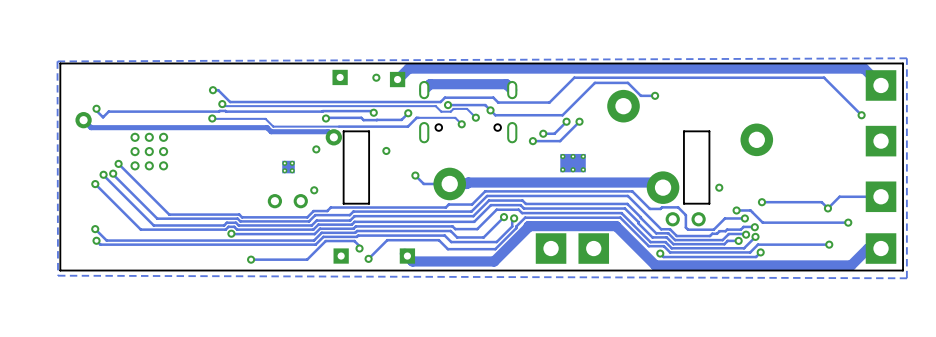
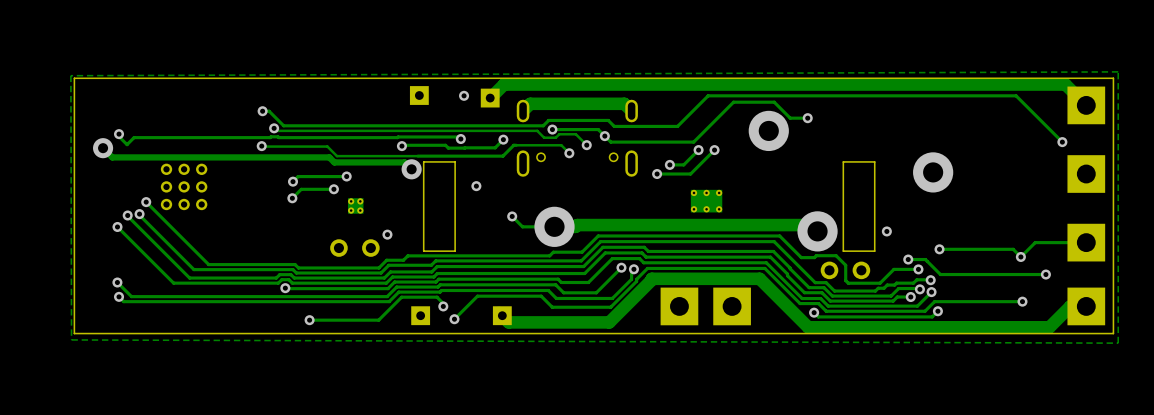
track: none -> (346, 176) (298, 176) (293, 181)
via: none -> (346, 176)
via: none -> (293, 181)
via: (316, 149) -> none
track: none -> (333, 189) (301, 189) (292, 198)
via: none -> (333, 189)
via: none -> (292, 198)

